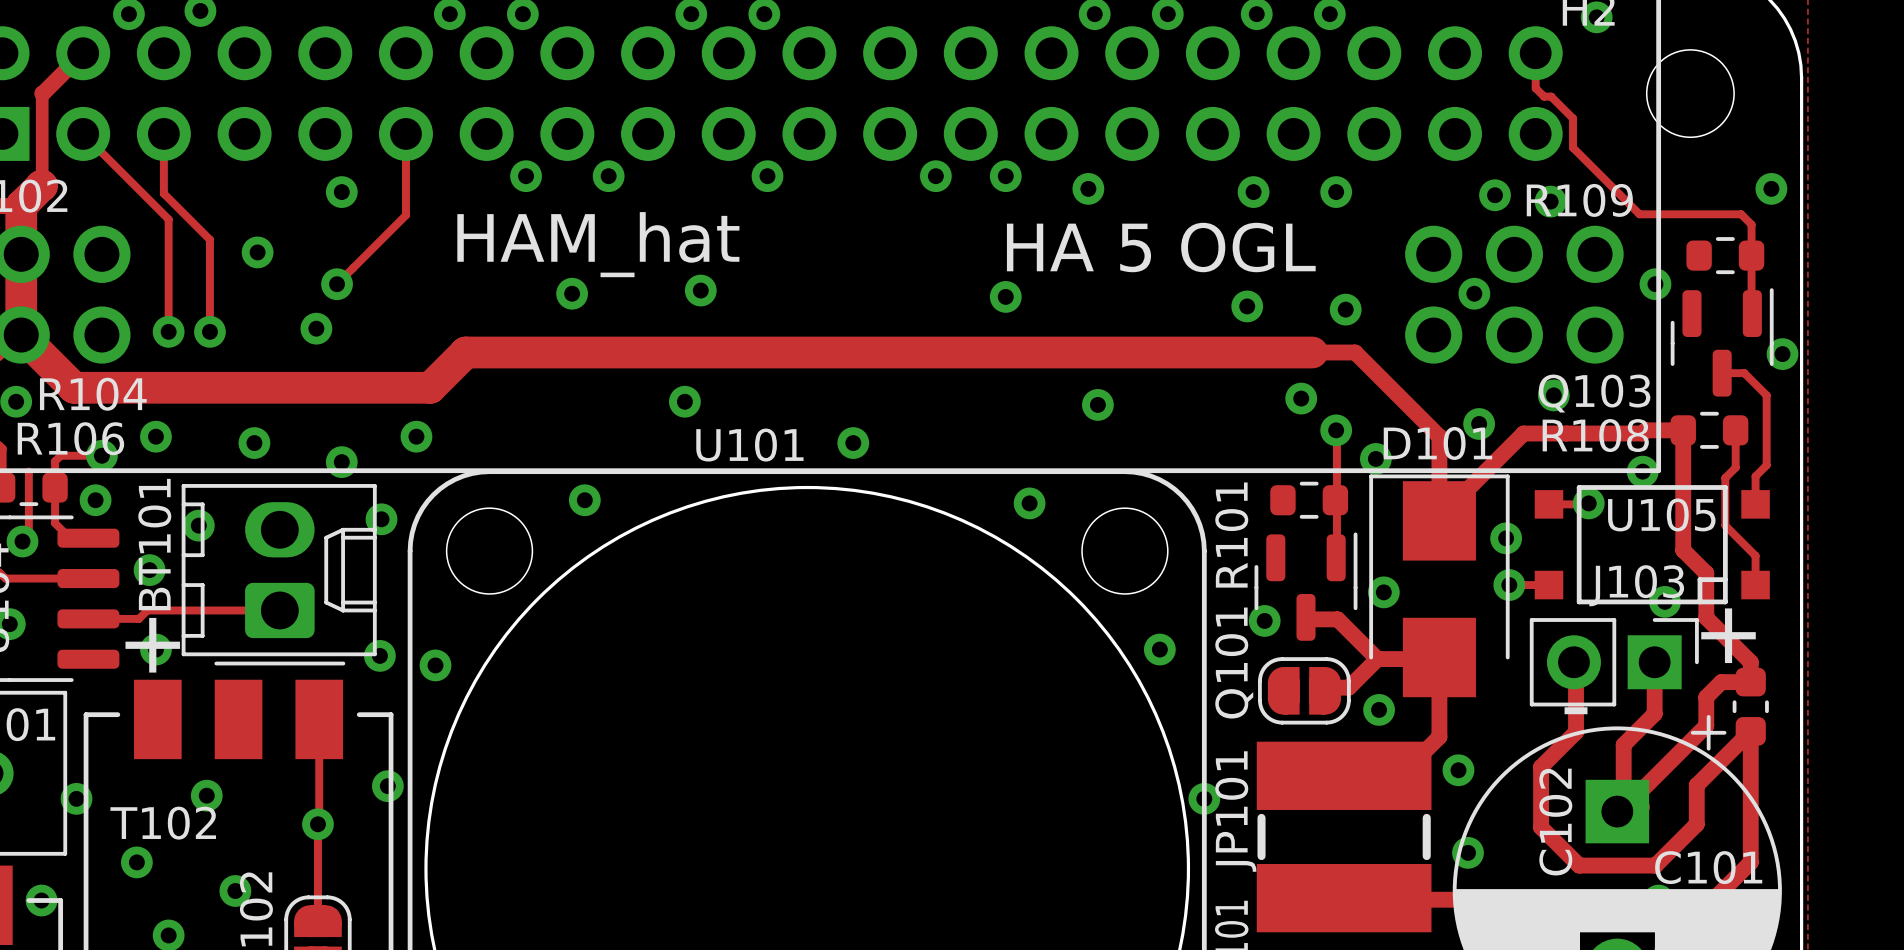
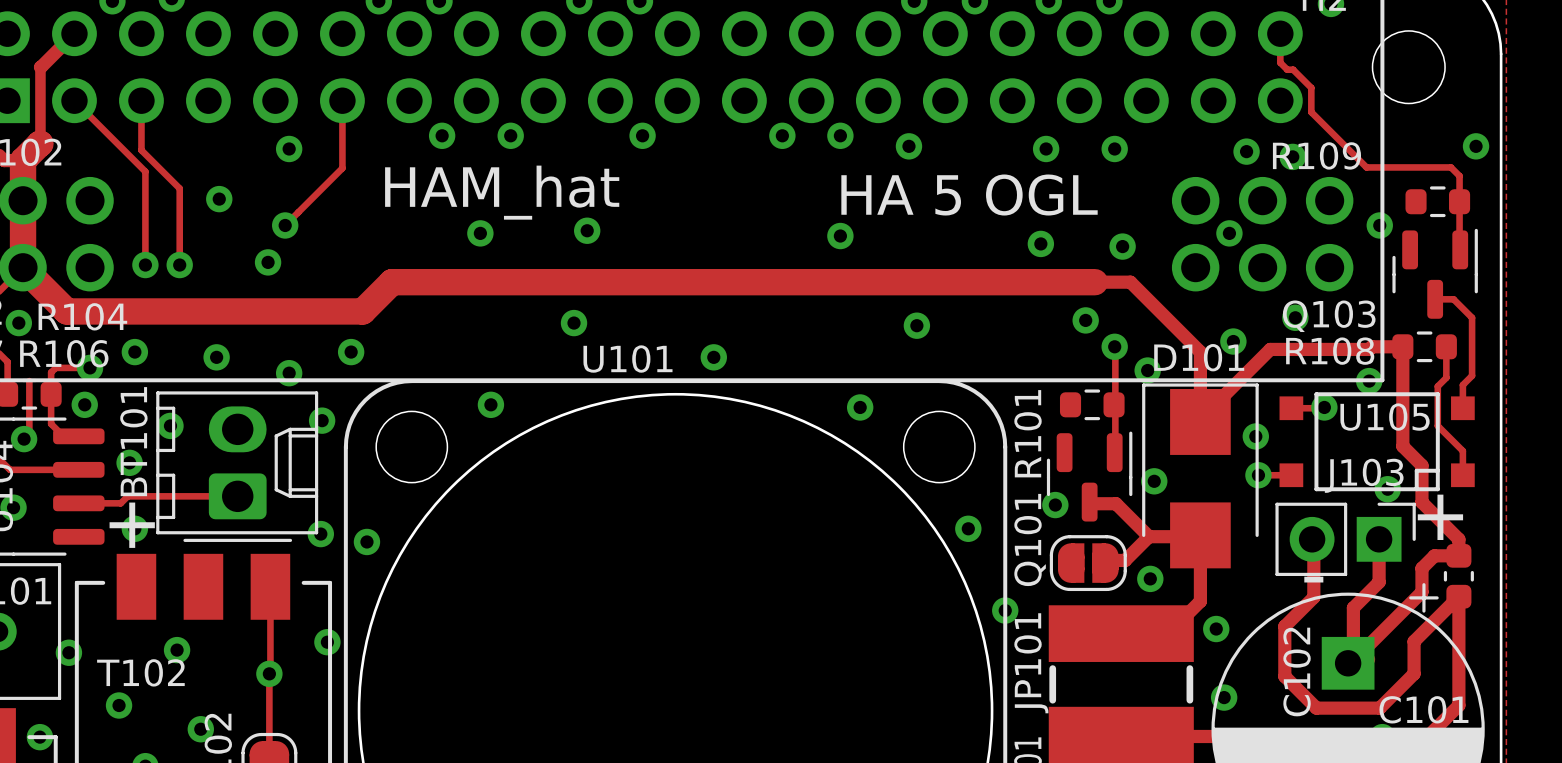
via: (1782, 354) -> none
via position: (1204, 798) -> (1005, 610)

